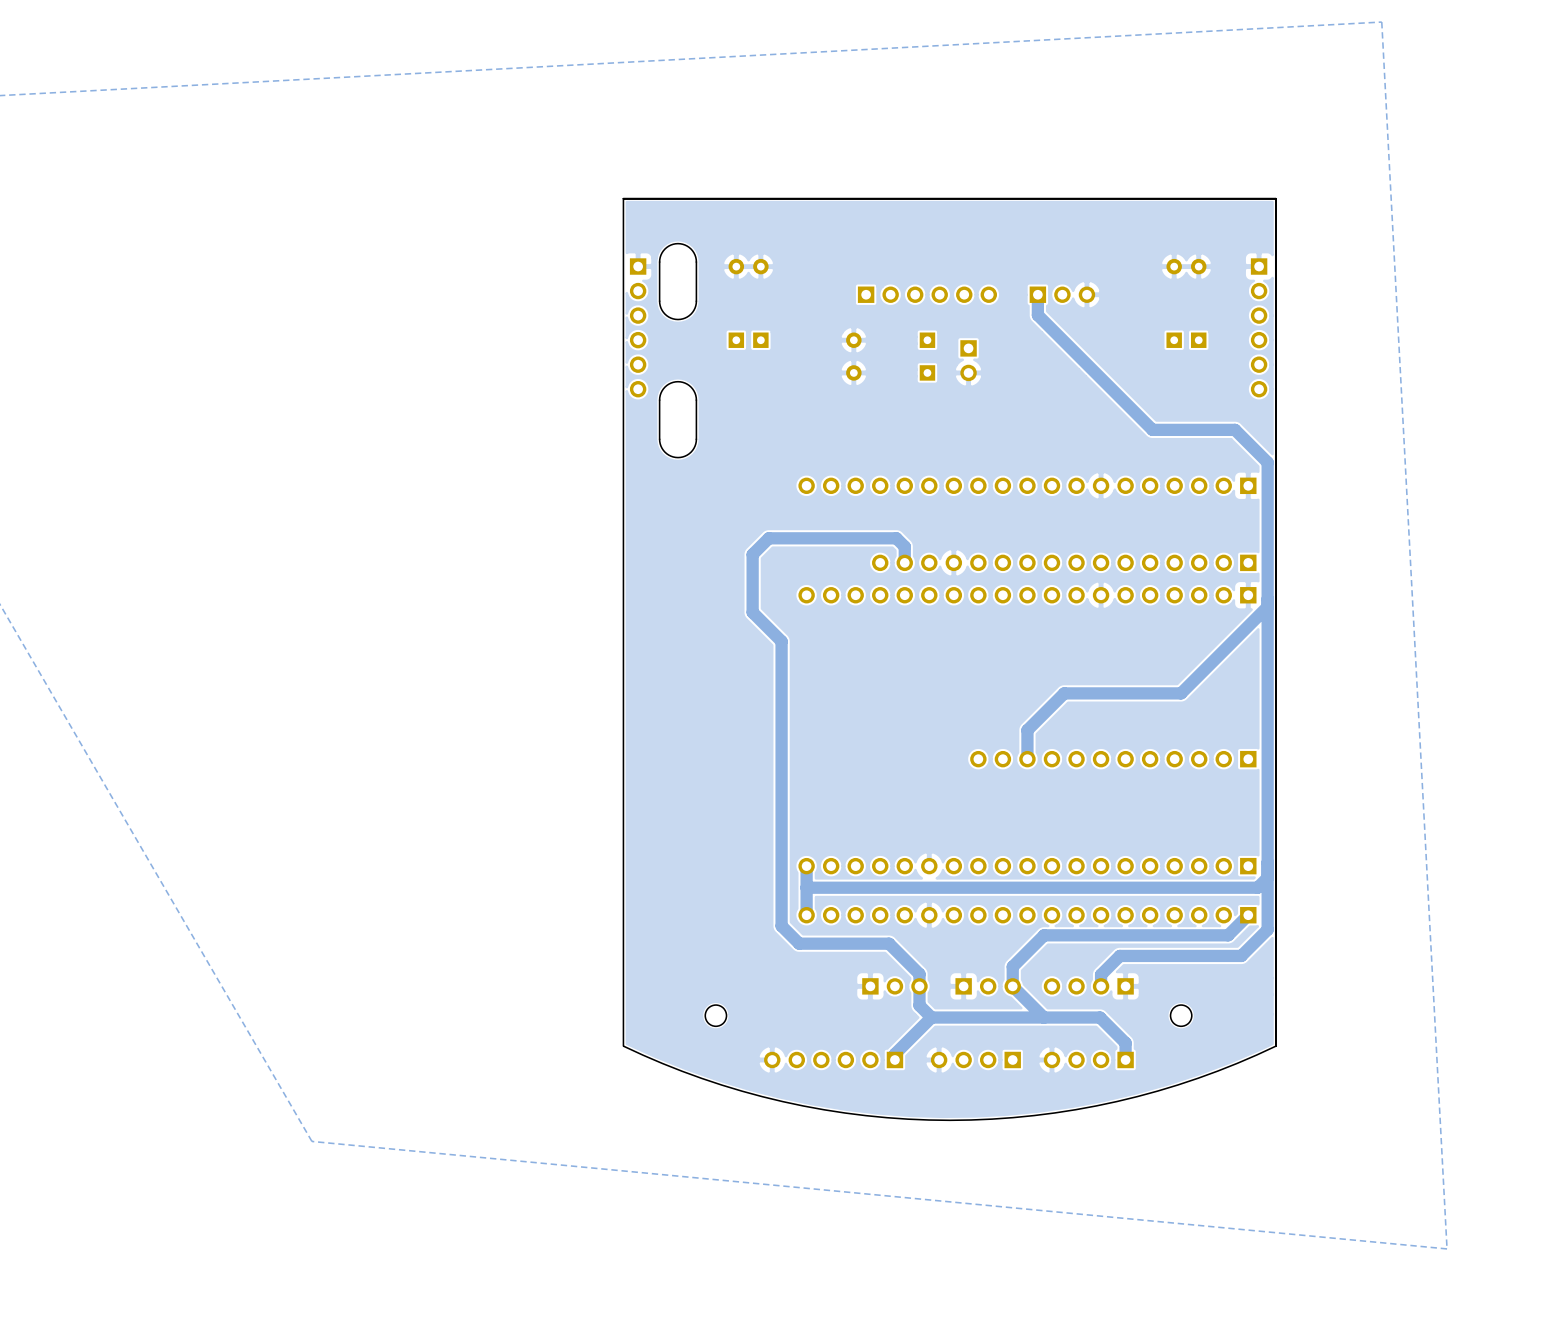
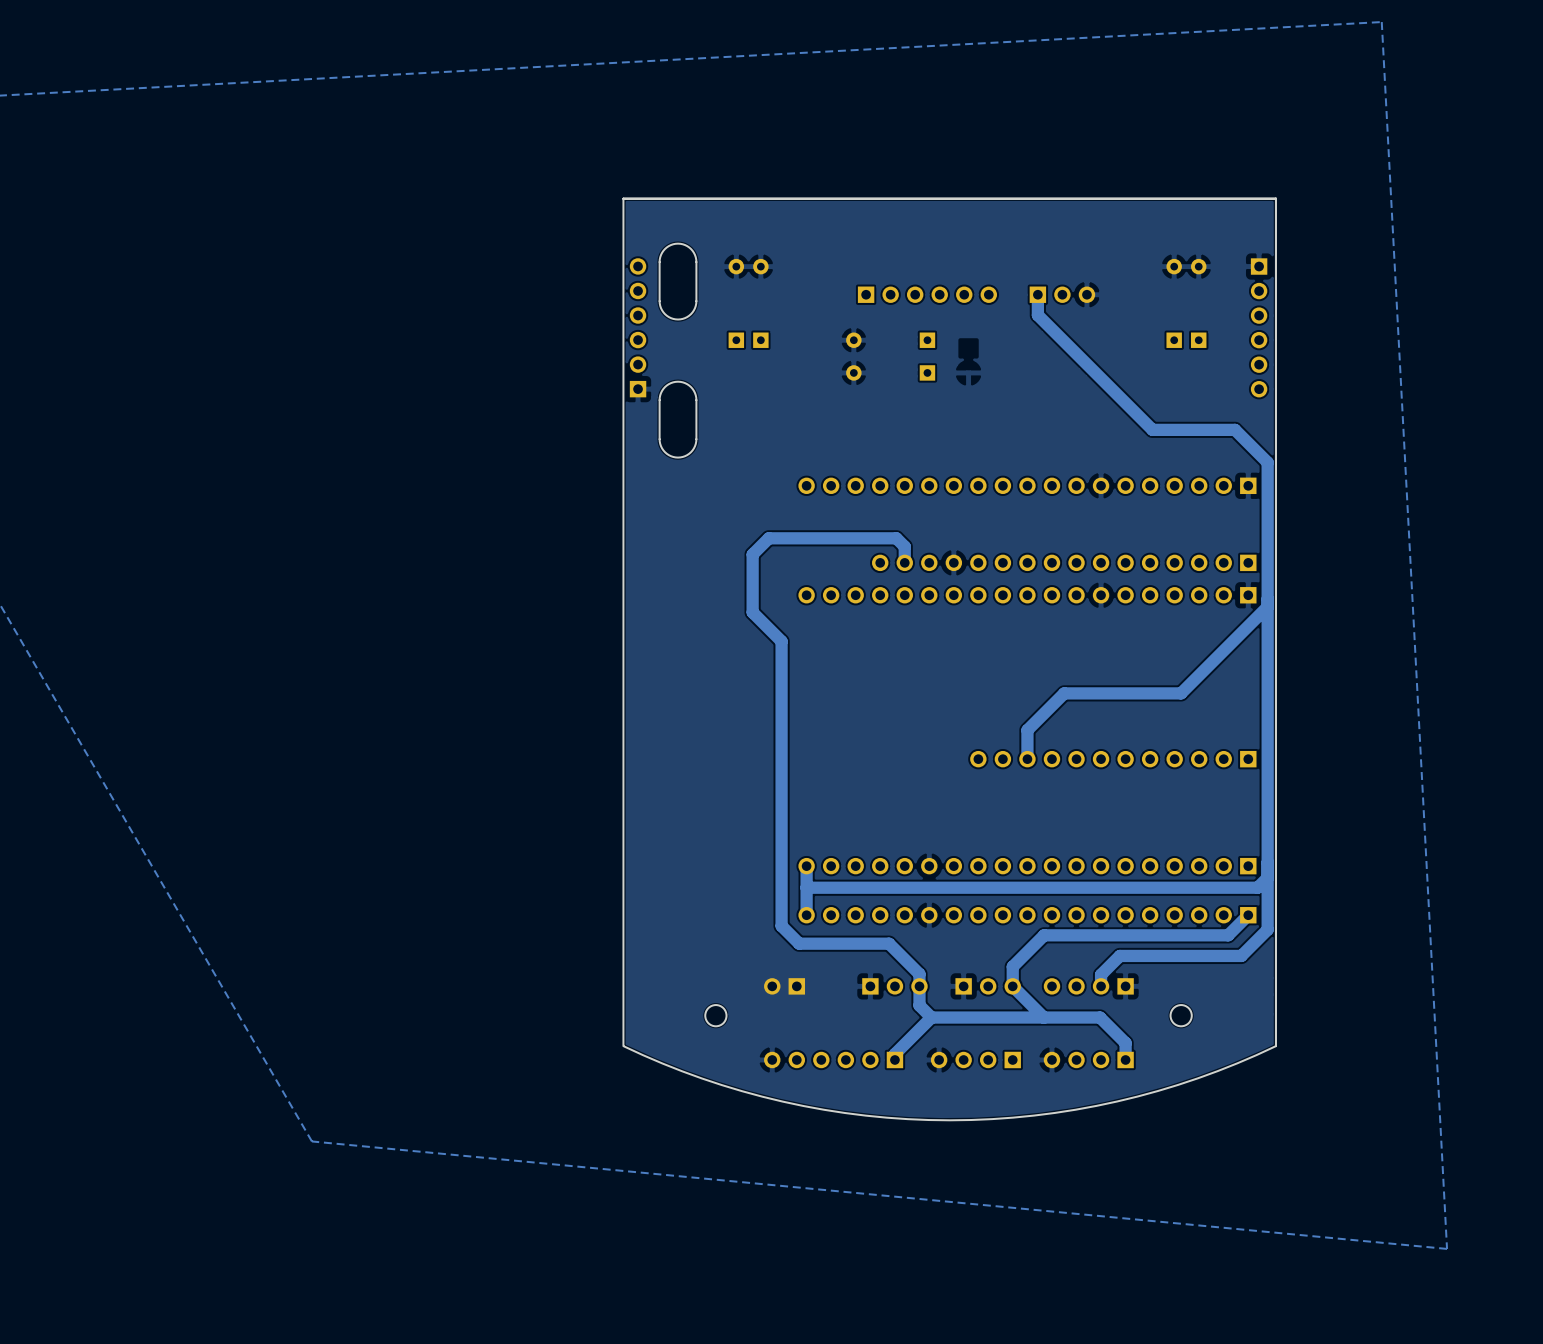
part rotation: 0° (638, 327) -> 180° (638, 327)
part: (968, 360) -> none
part: none -> (784, 986)

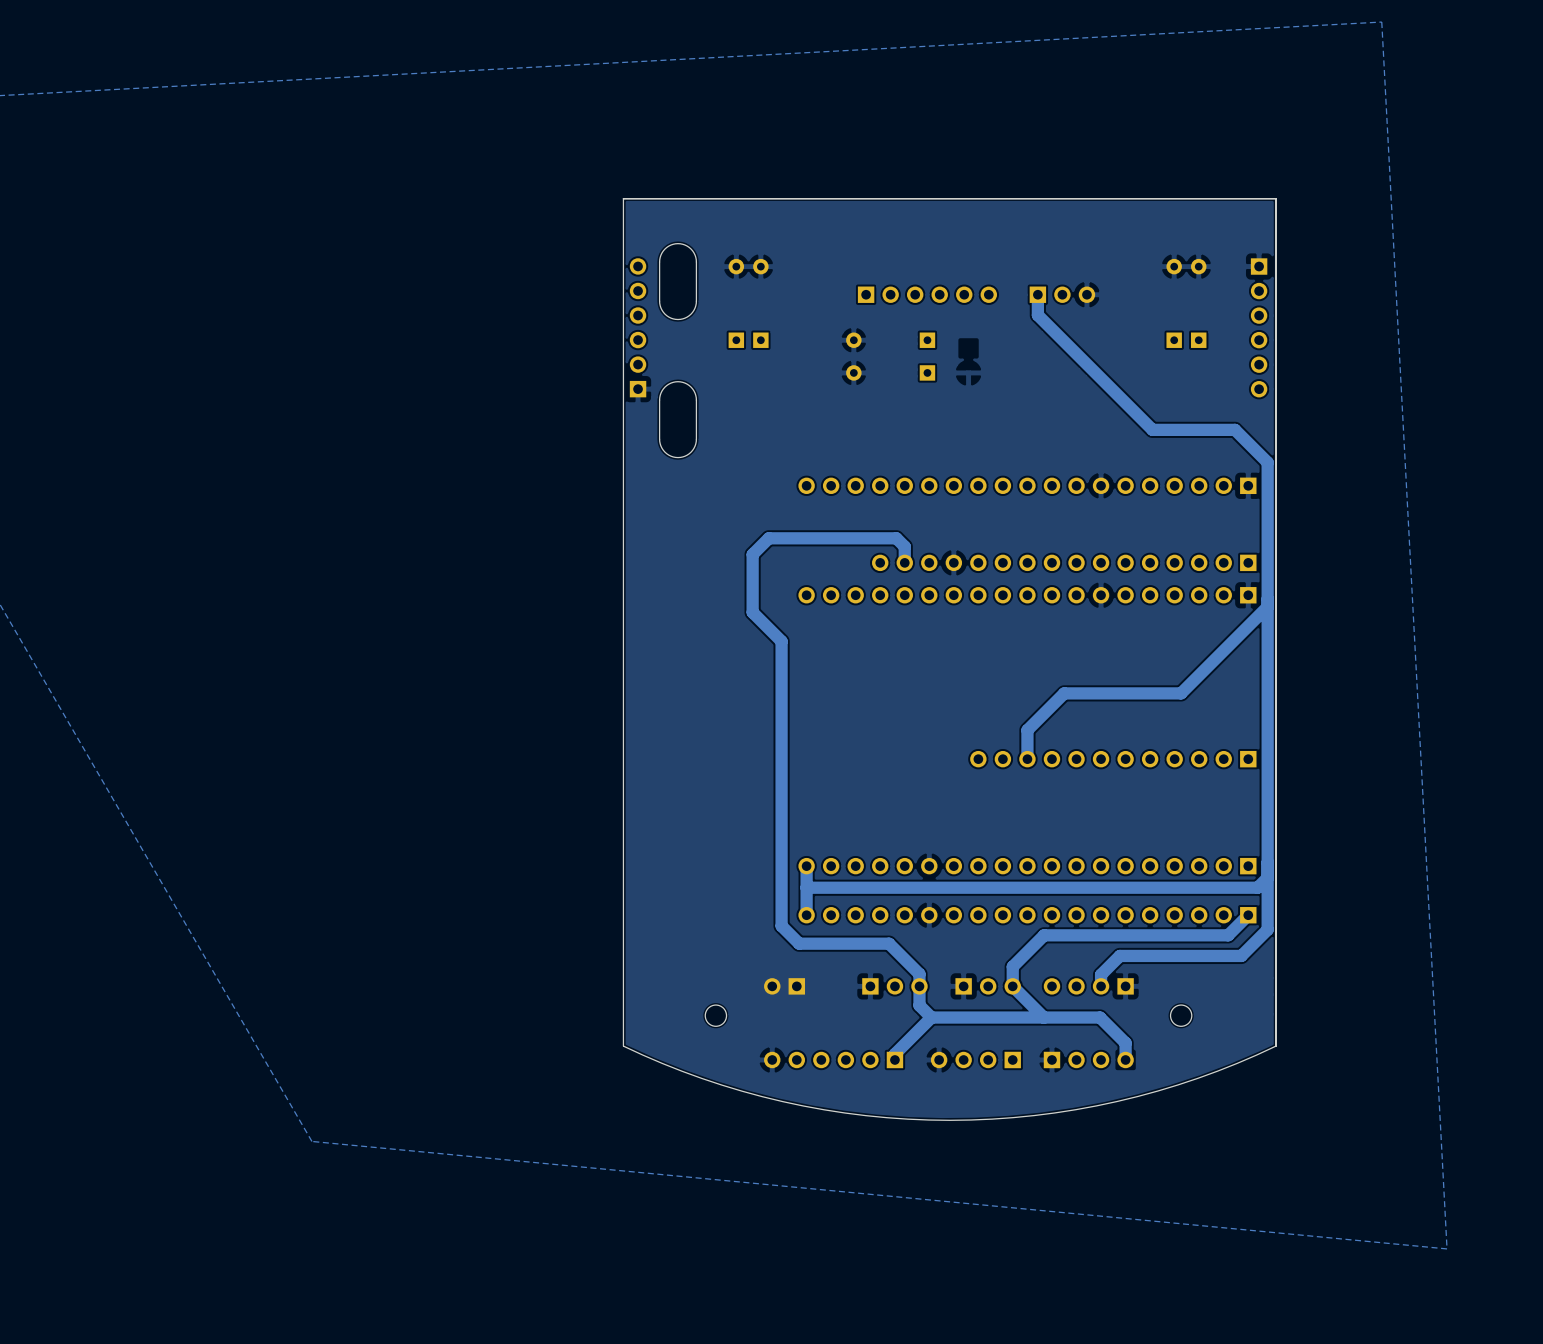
part rotation: 0° (1088, 1059) -> 180° (1088, 1059)

